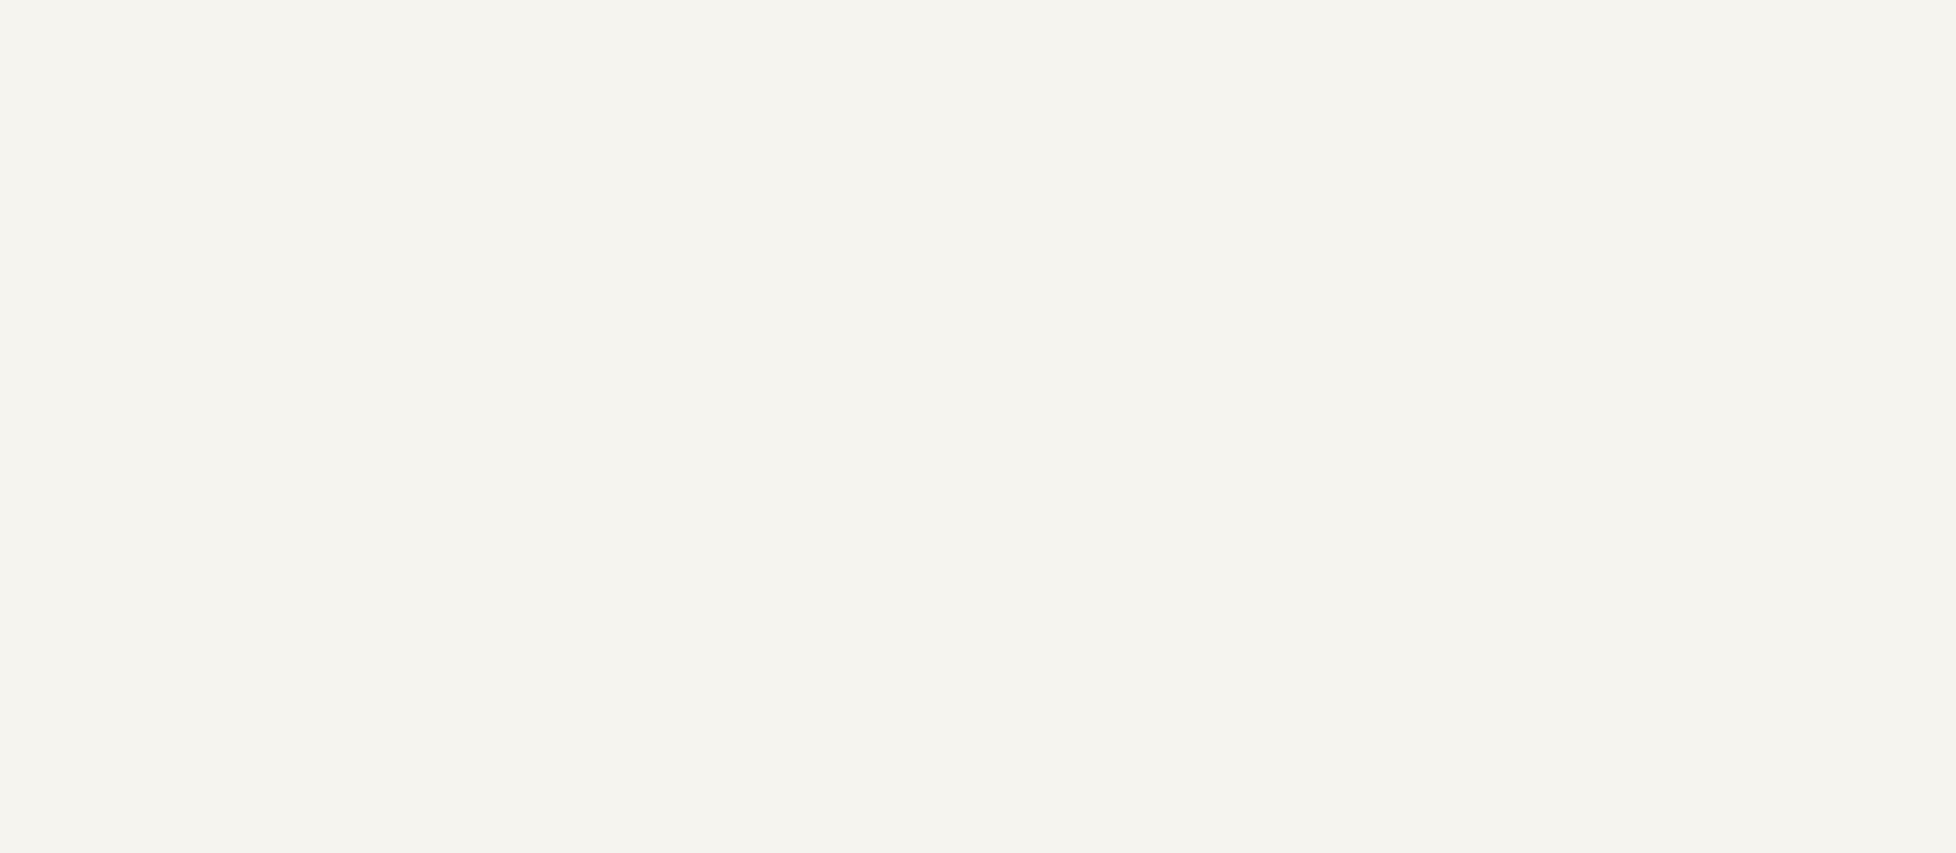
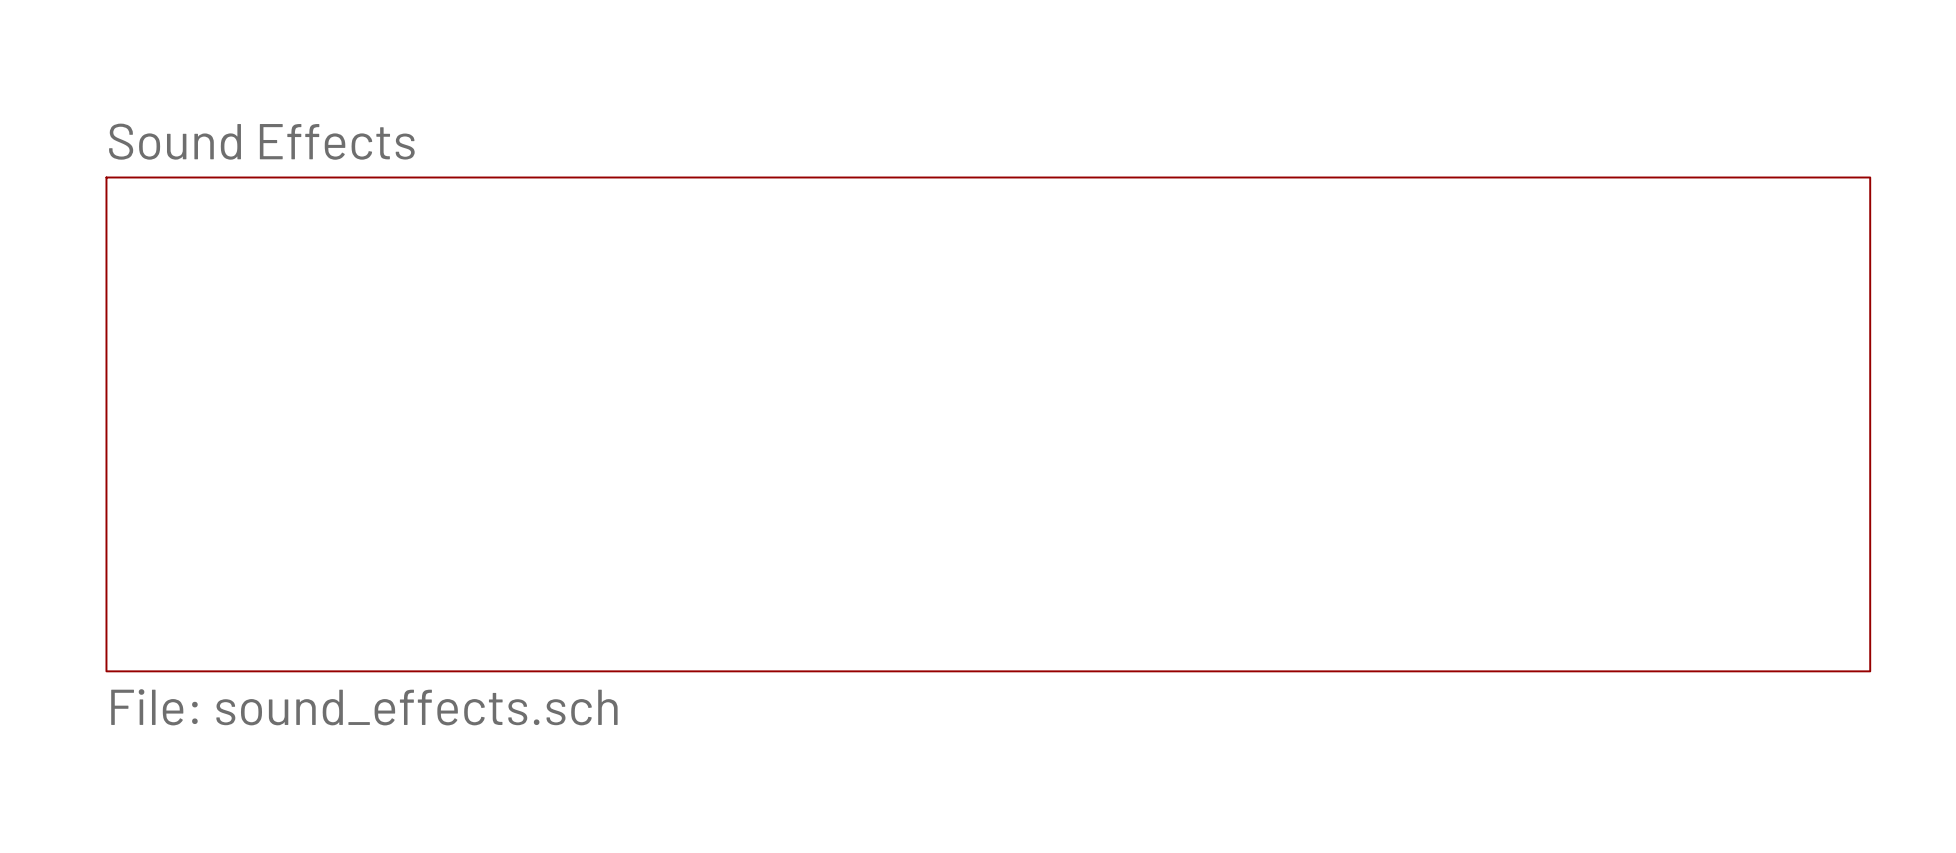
sheet Sound Effects: none -> File: sound_effects.sch (988, 424)

